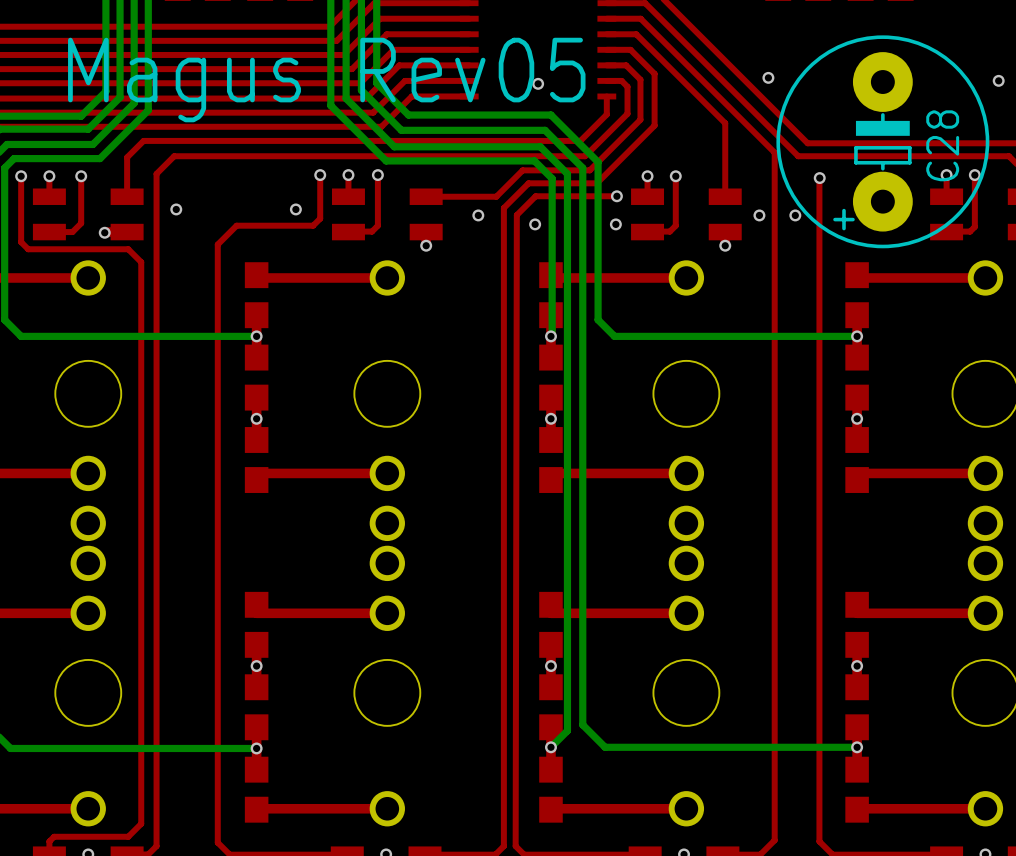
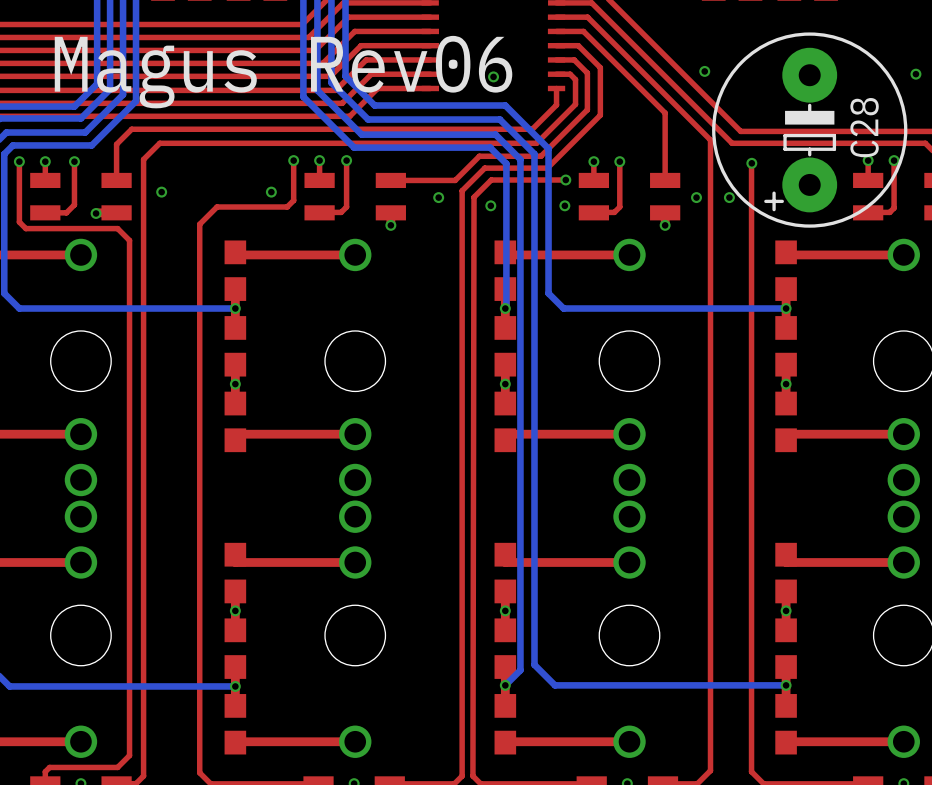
text: Magus Rev05 (326, 80) -> Magus Rev06 (283, 72)

